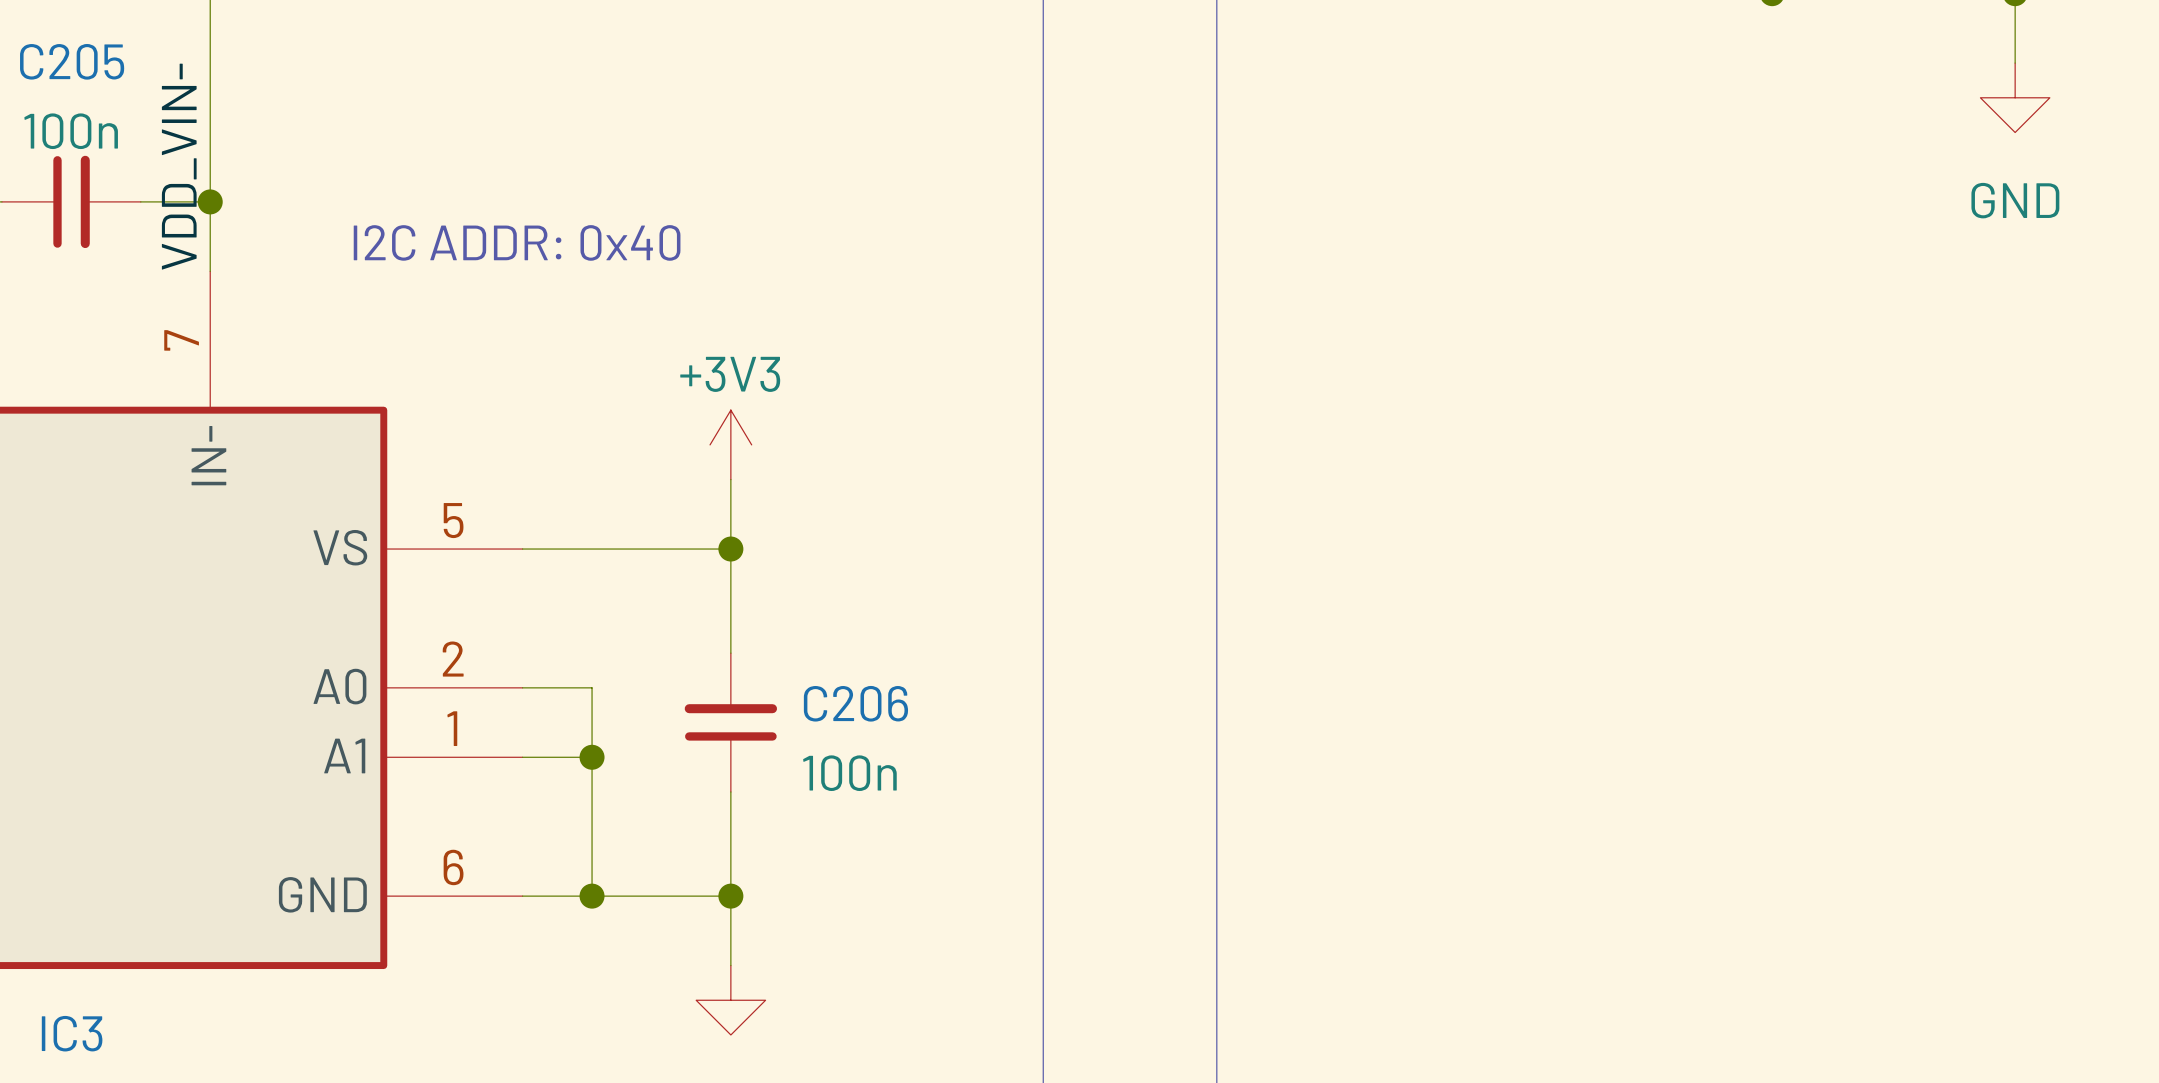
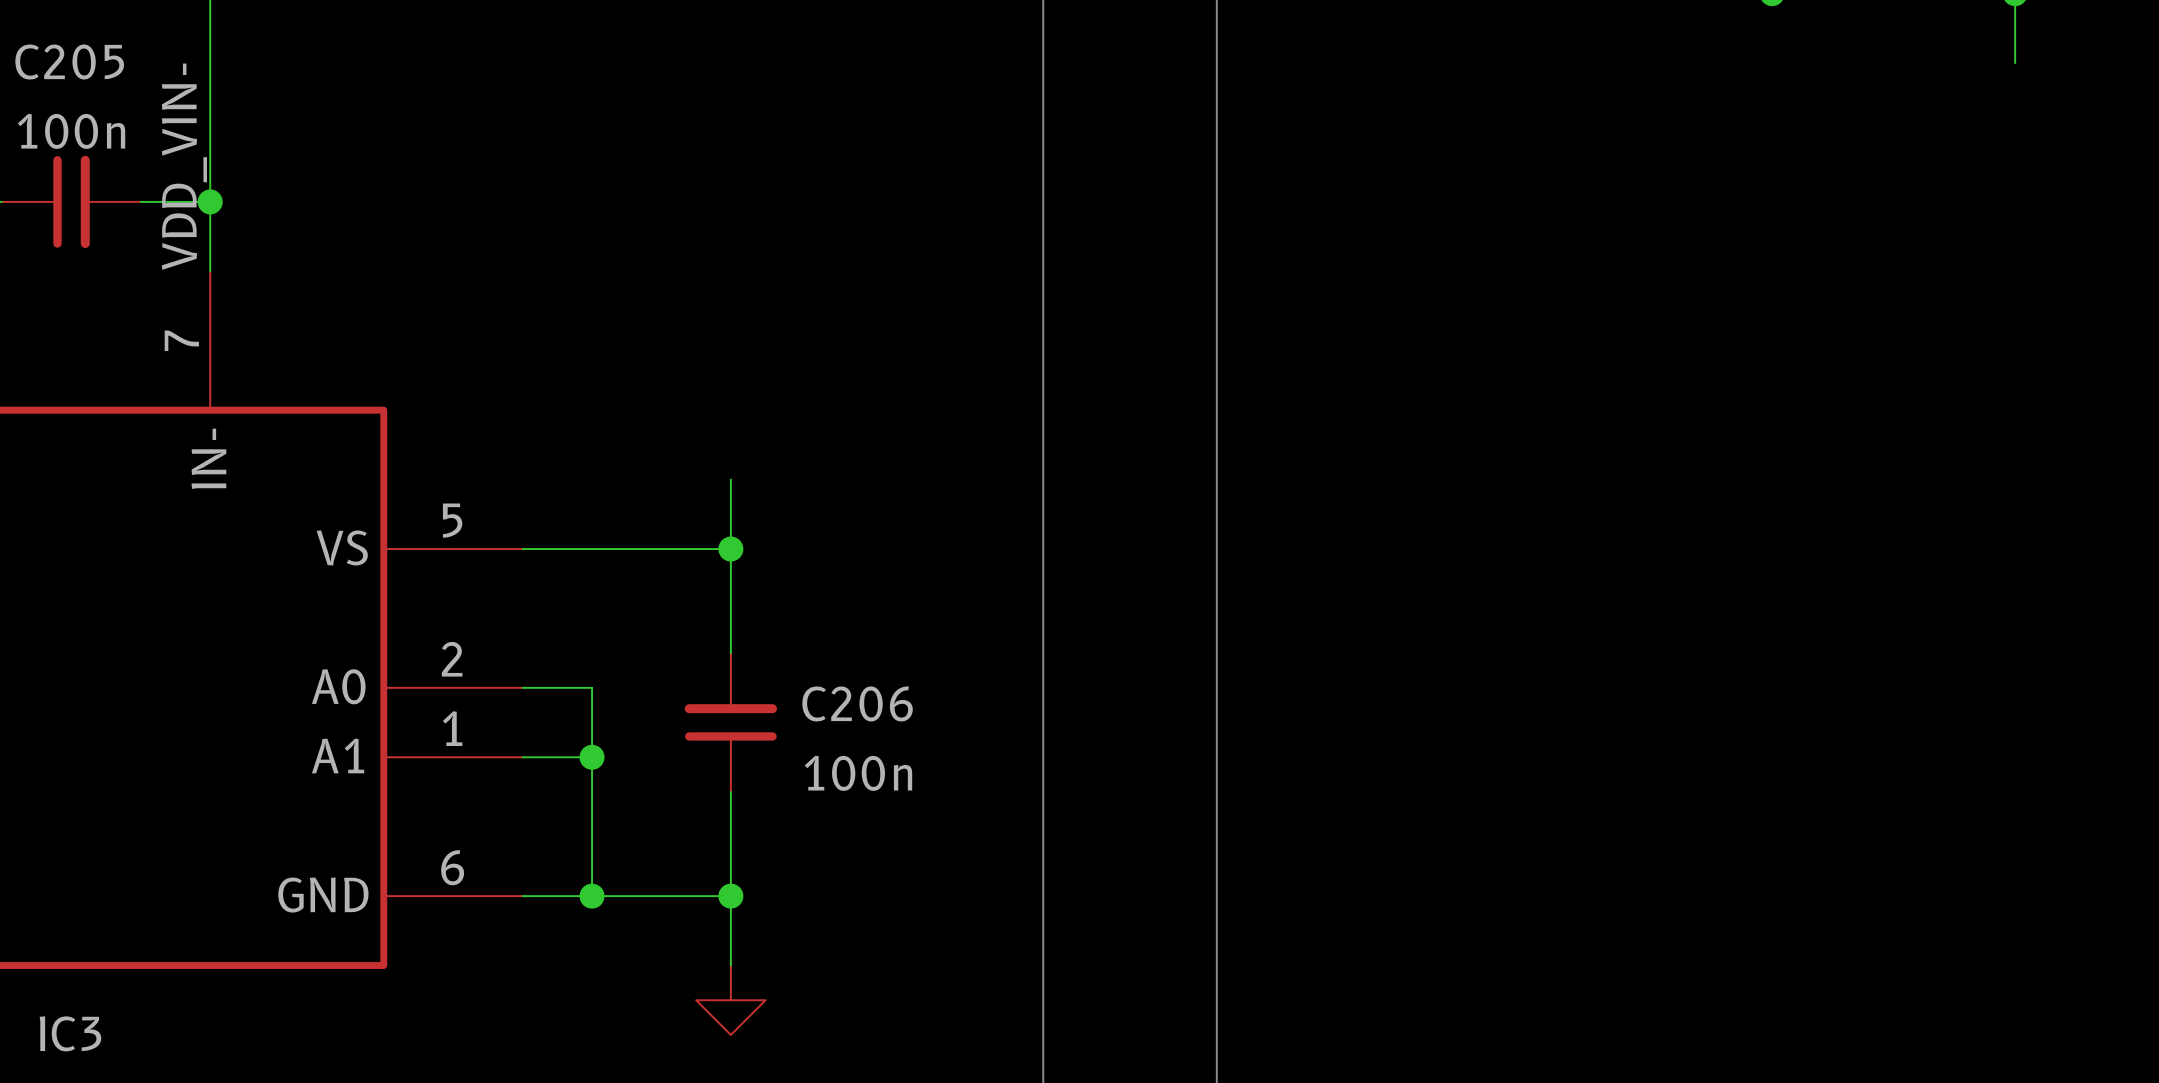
power symbol: GND (2015, 97) -> none
text: I2C ADDR: 0x40 (517, 242) -> none
power symbol: +3V3 (730, 444) -> none

